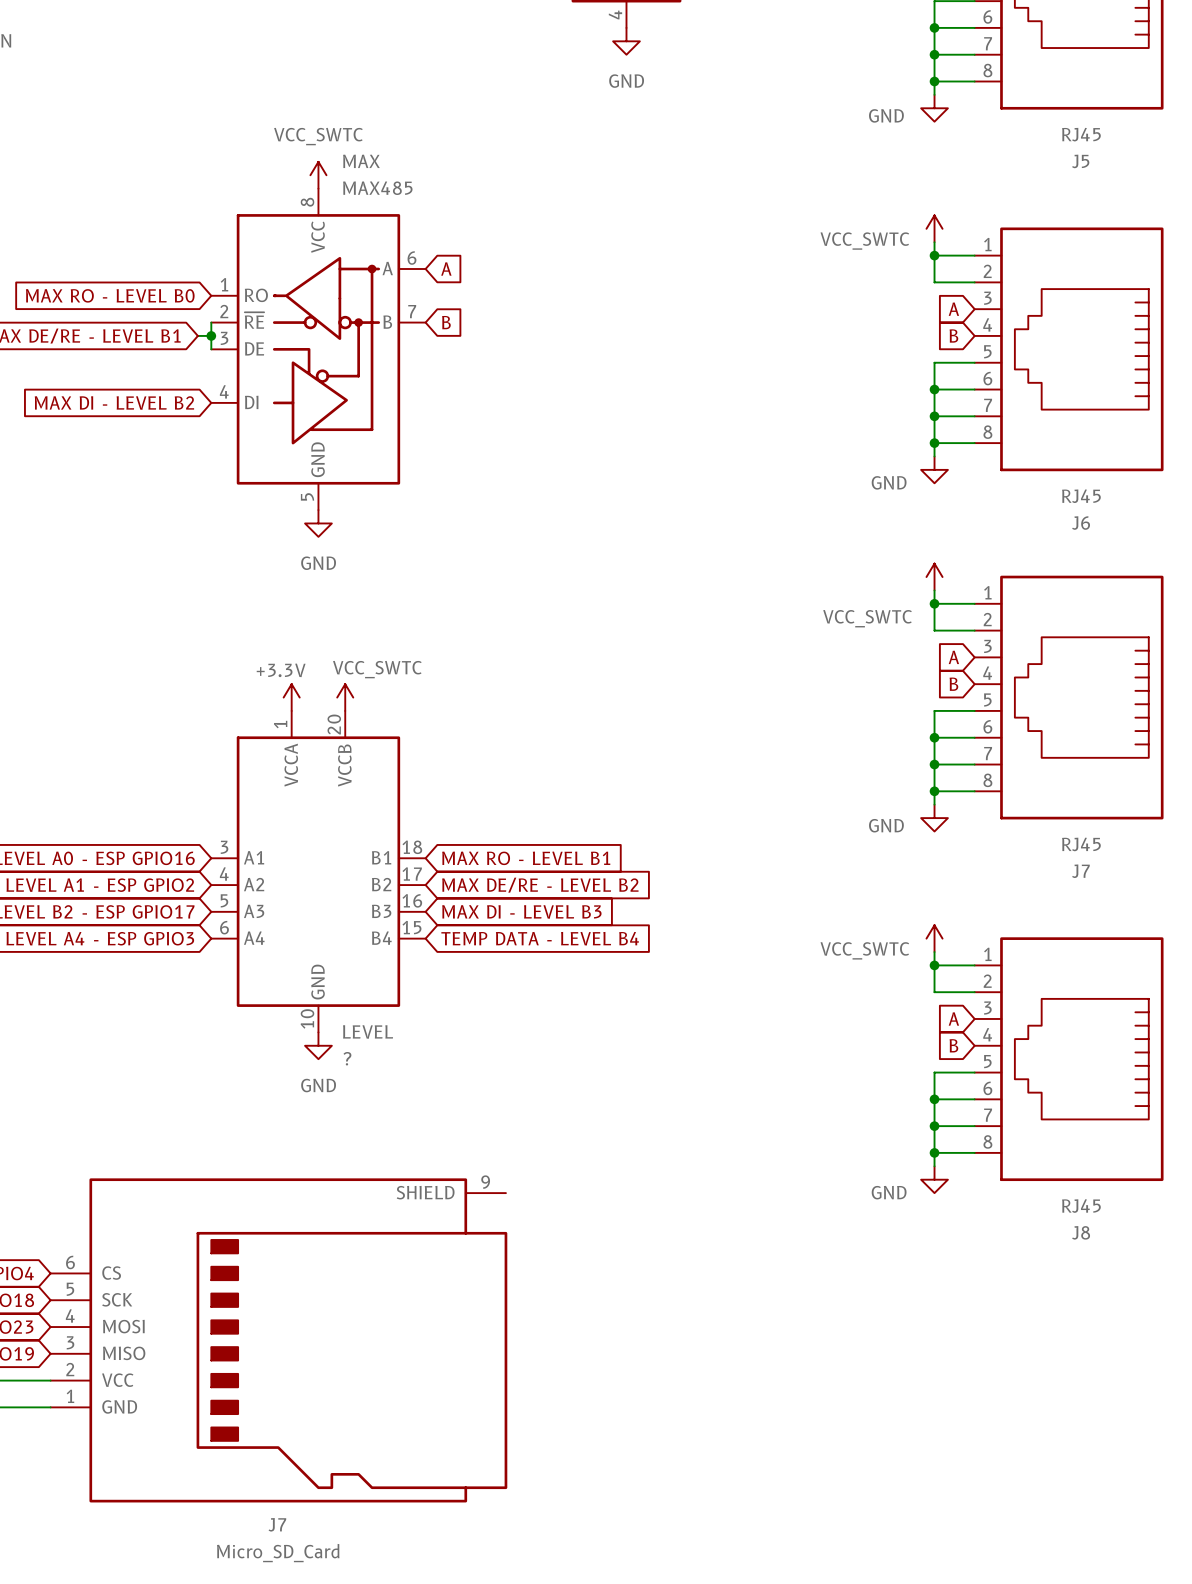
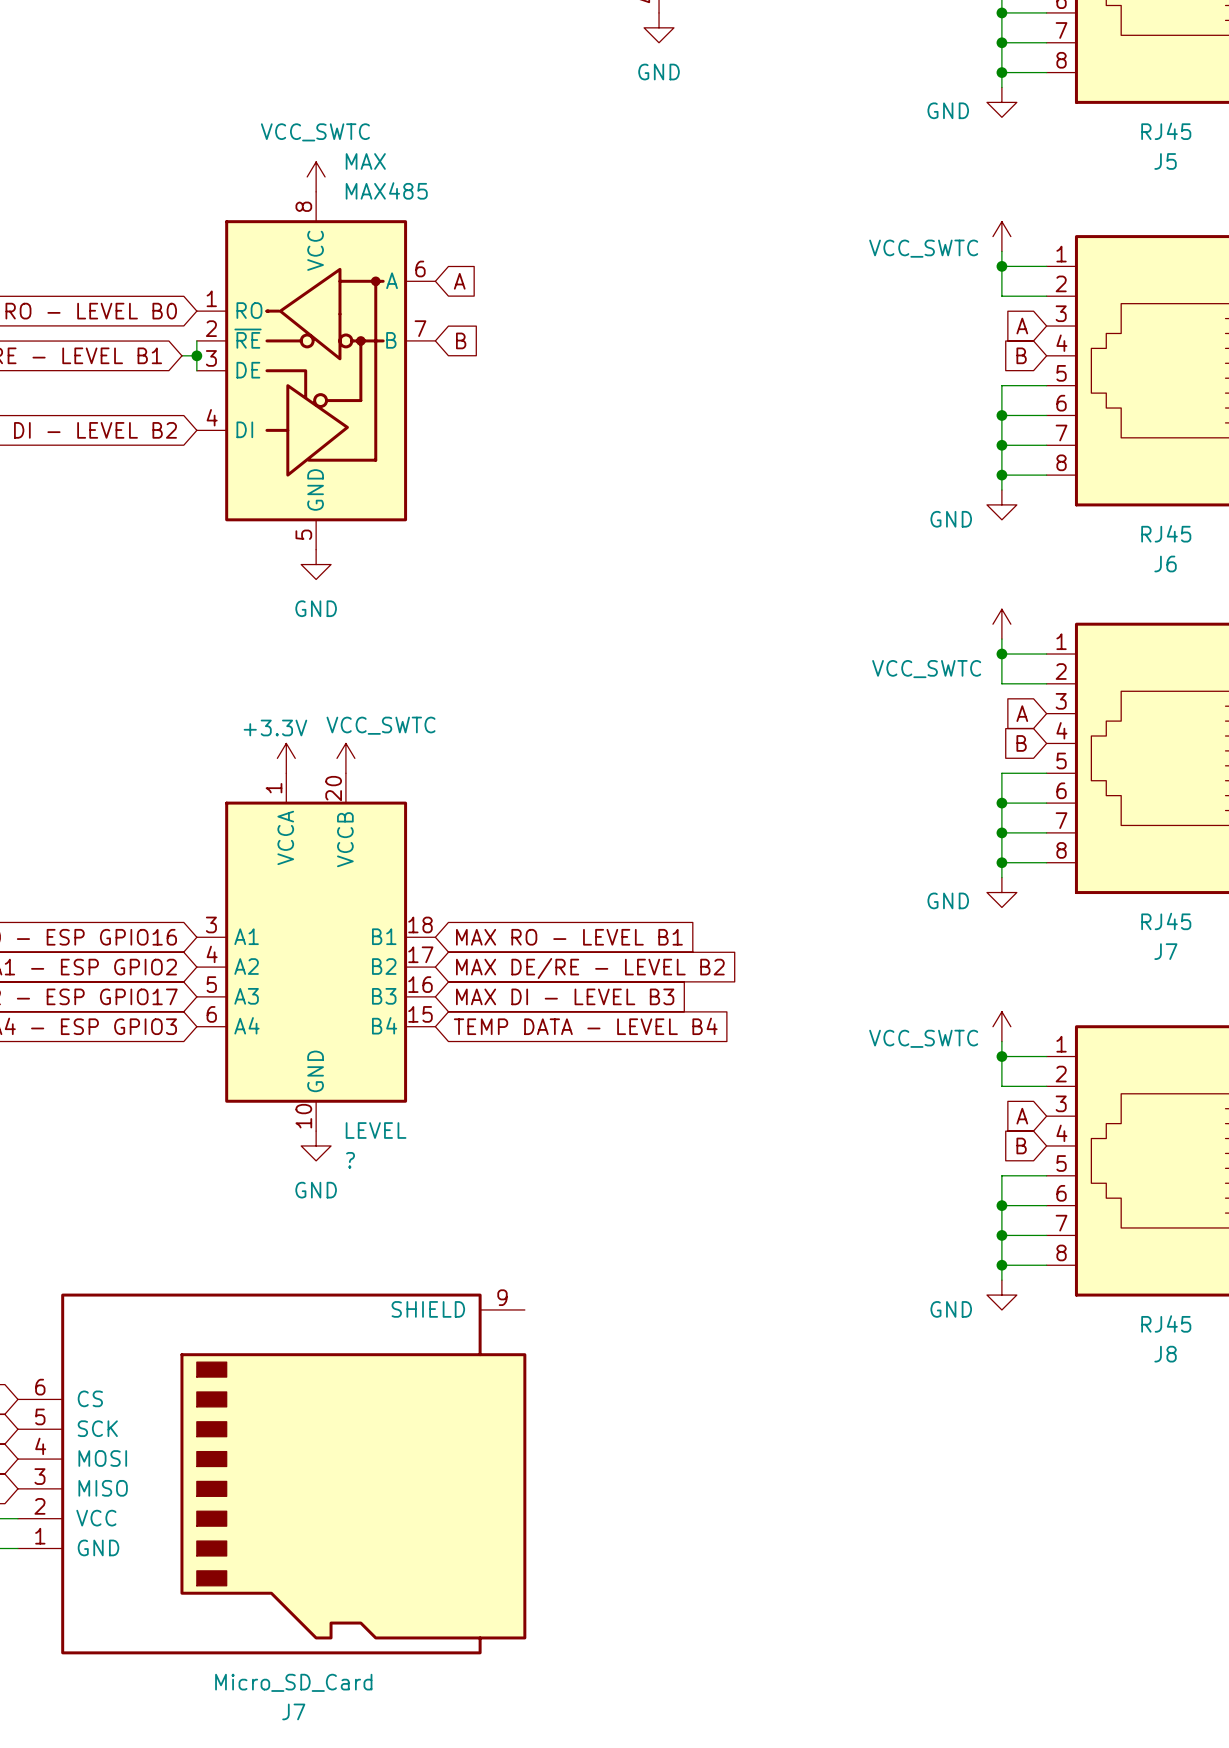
J7 name position: J7 (277, 1524) -> J7 (293, 1711)
J7 value position: Micro_SD_Card (278, 1553) -> Micro_SD_Card (293, 1682)

